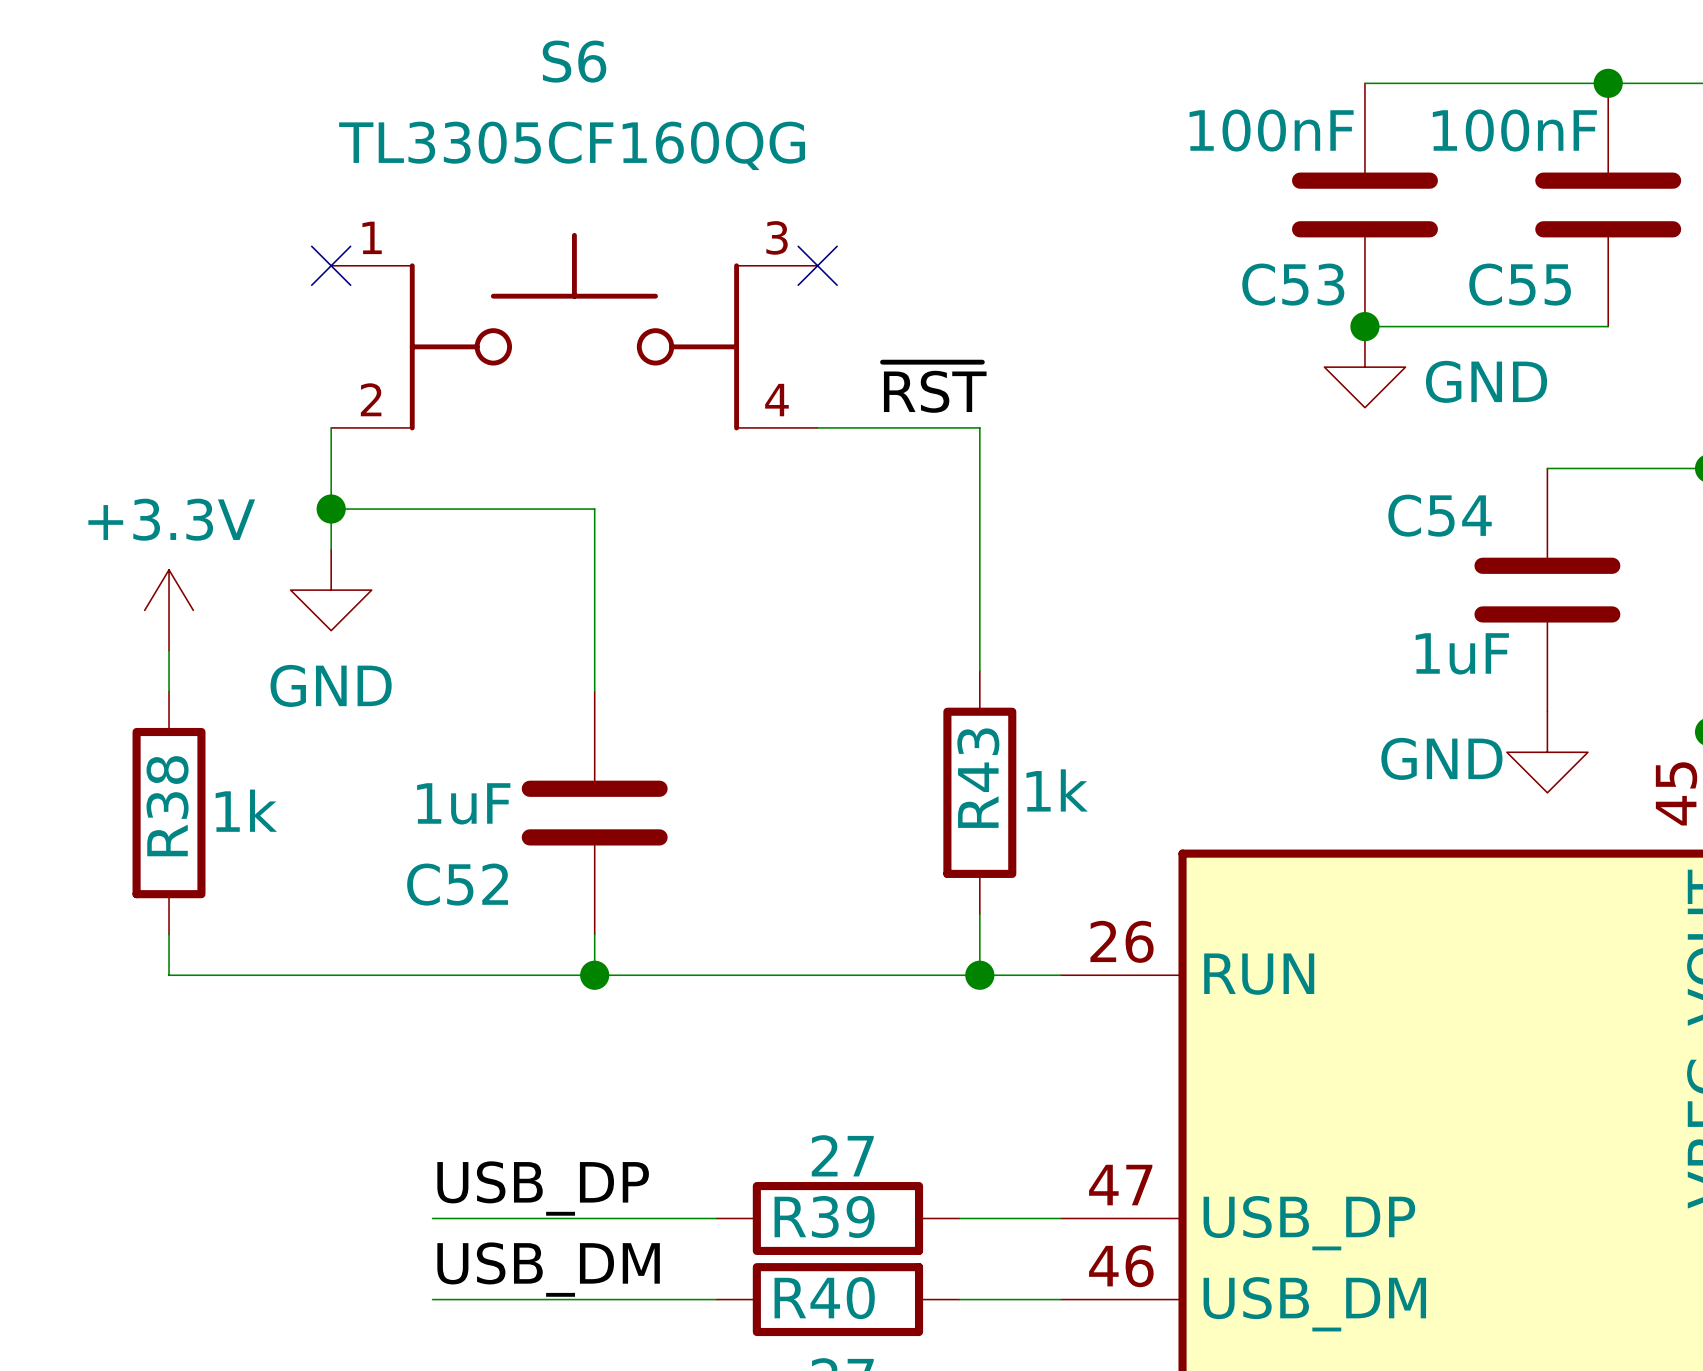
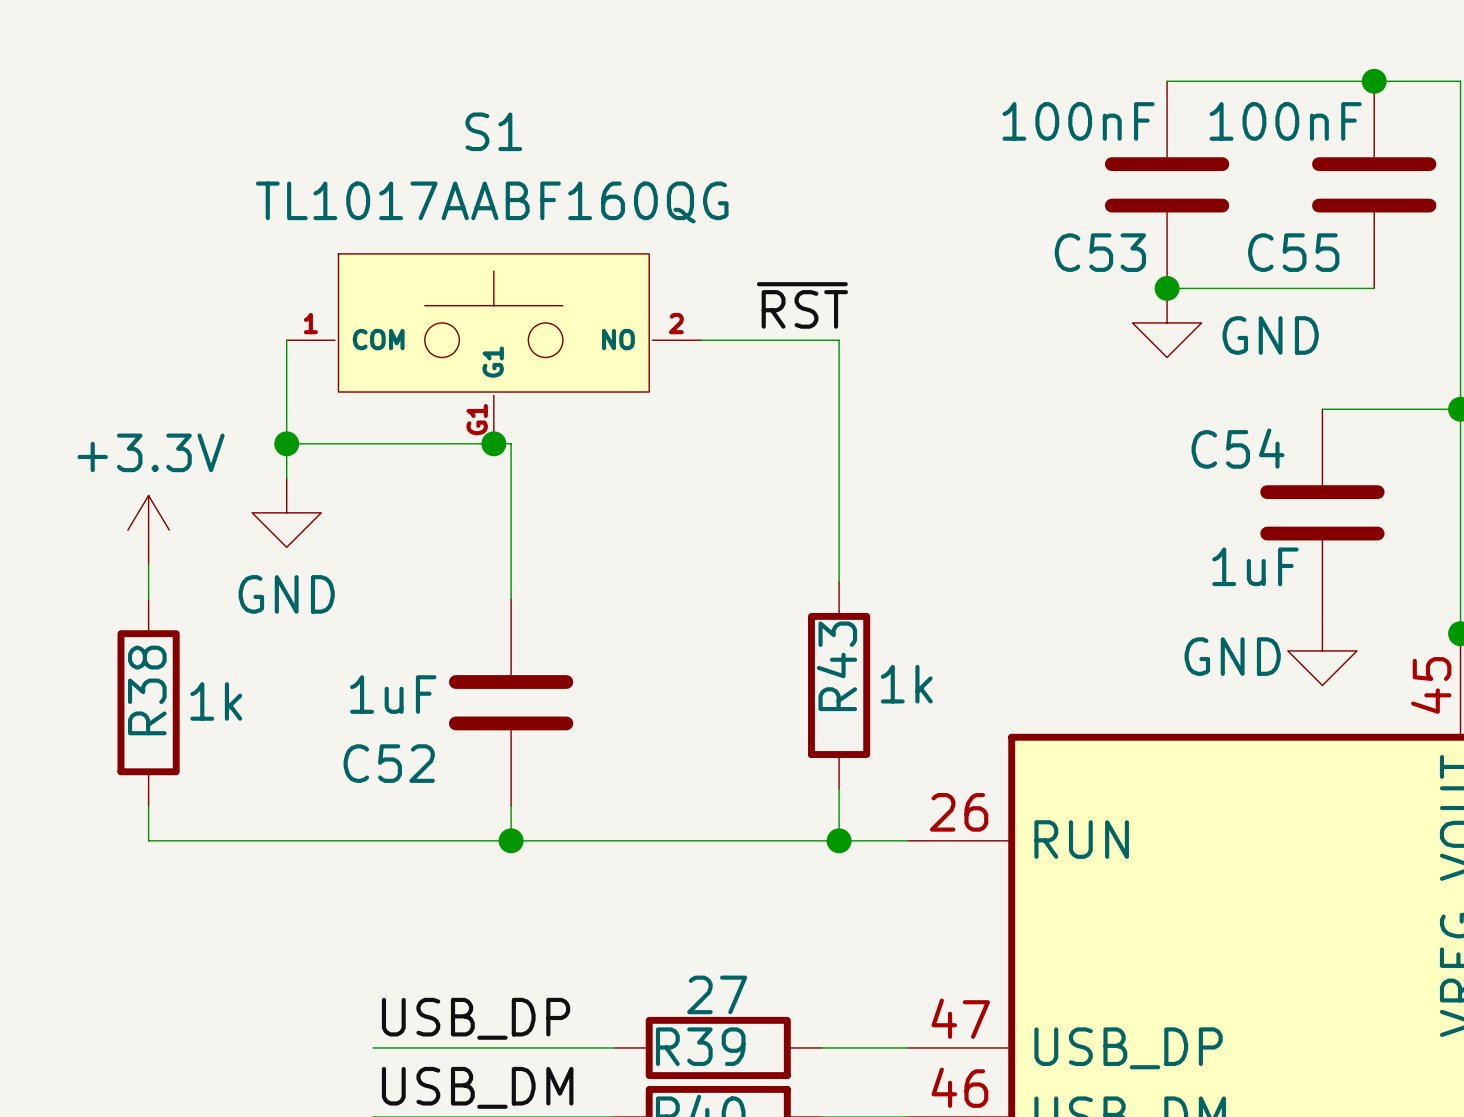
no-connect mark: (331, 265) -> none
no-connect mark: (817, 265) -> none
S6: TL3305CF160QG (574, 331) -> none
wire: none -> (286, 340) (286, 374)
label position: ~{RST} (934, 387) -> ~{RST} (802, 305)
S1: none -> TL1017AABF160QG (493, 348)
wire: (817, 427) (979, 427) -> (700, 340) (839, 340) (839, 374)
junction: none -> (493, 443)

